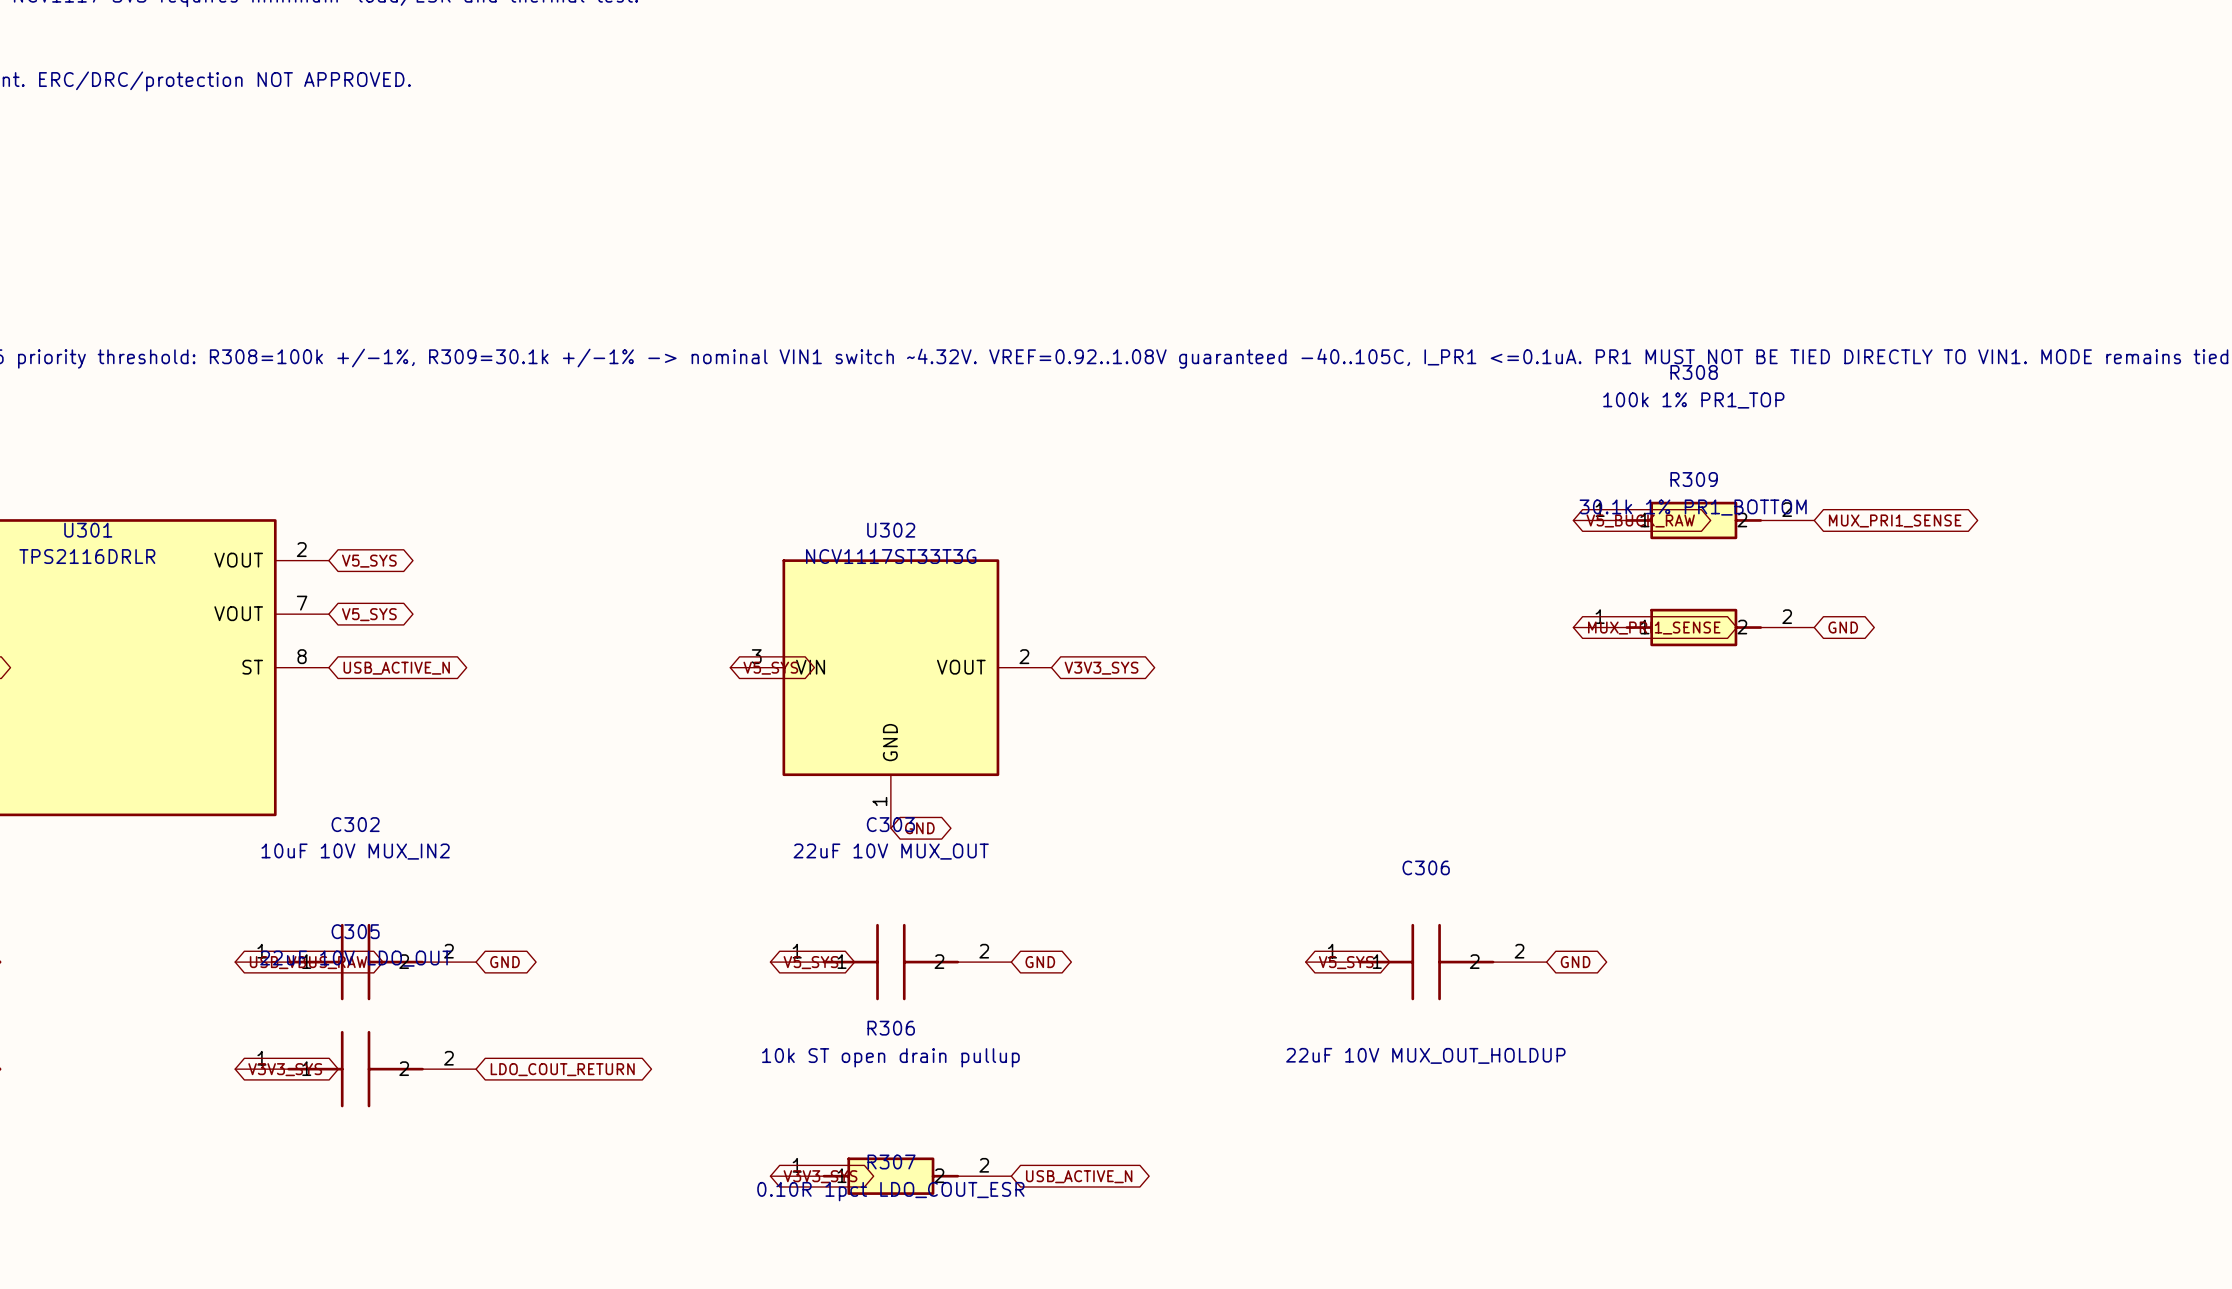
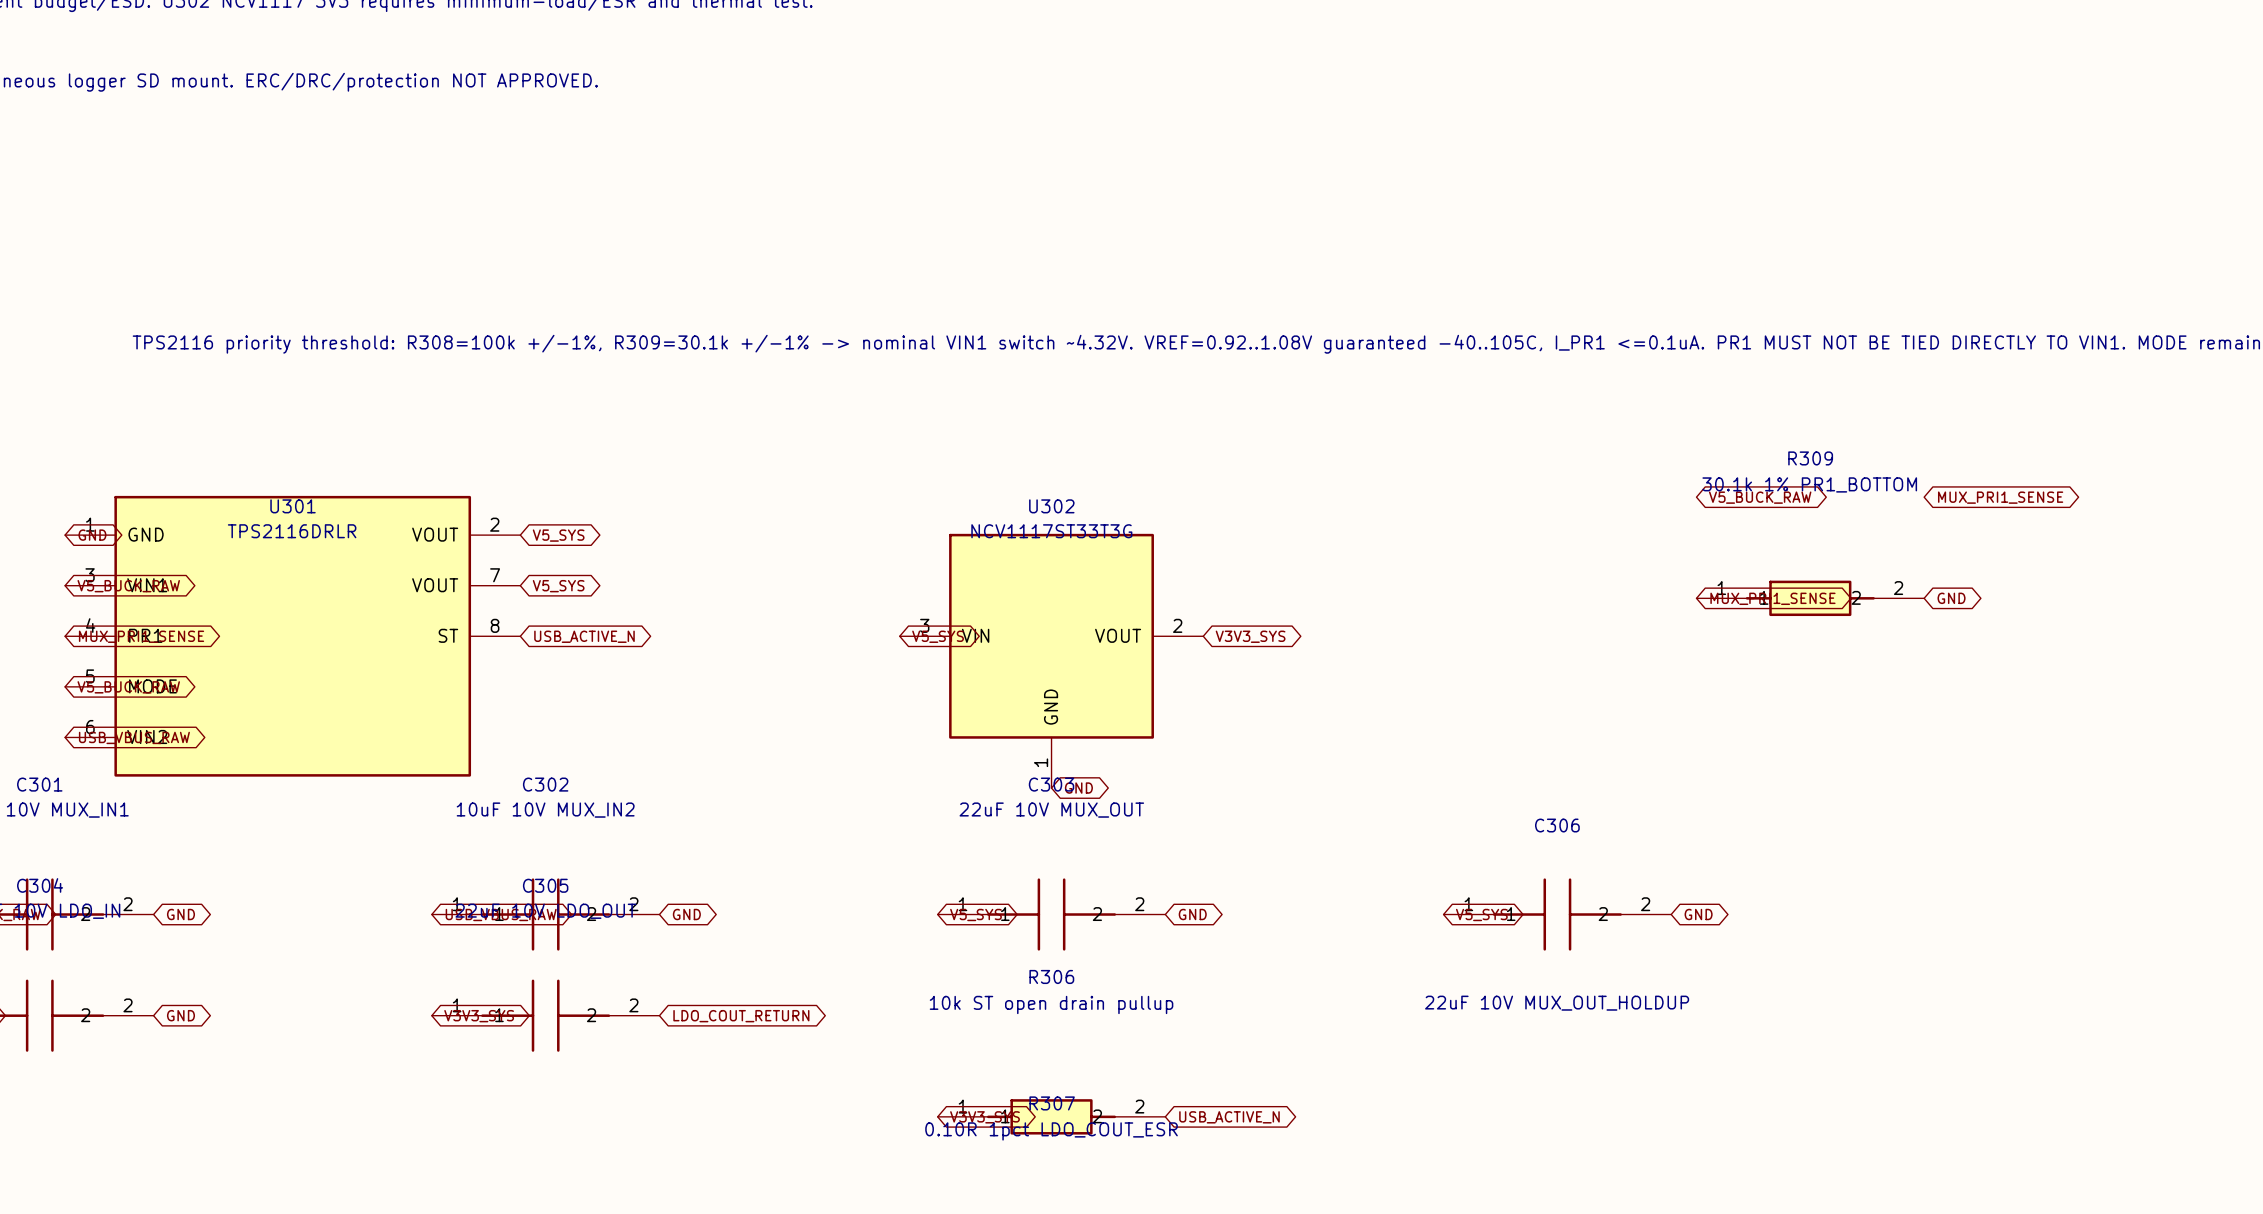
R308: 100k 1% PR1_TOP (1693, 520) -> none

